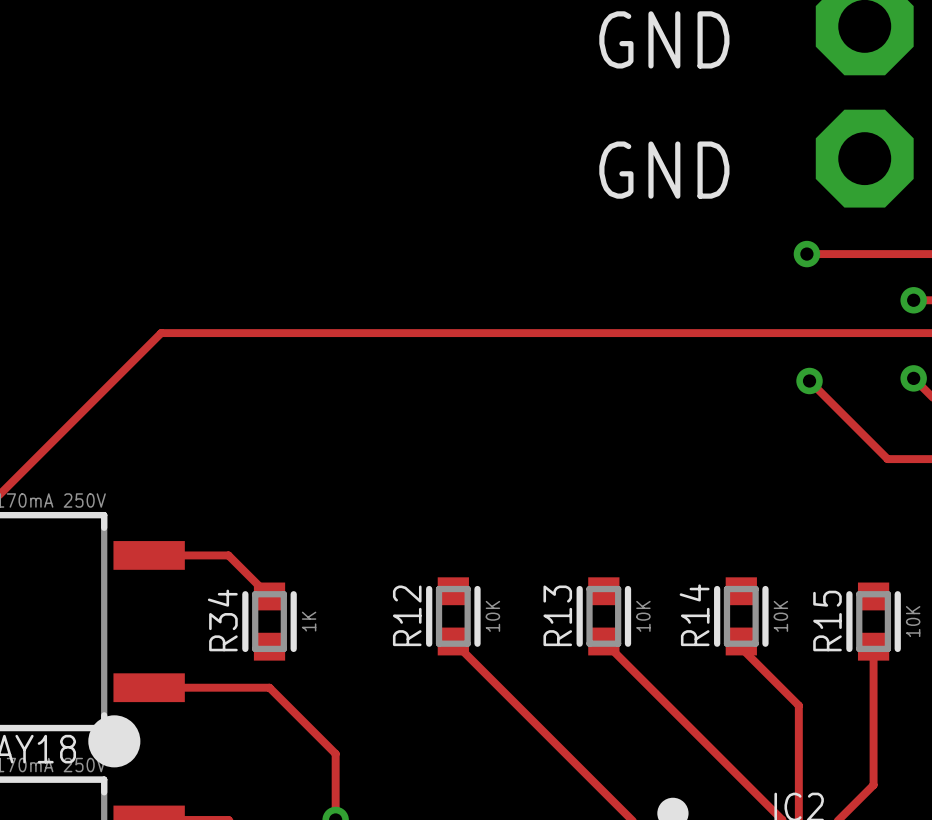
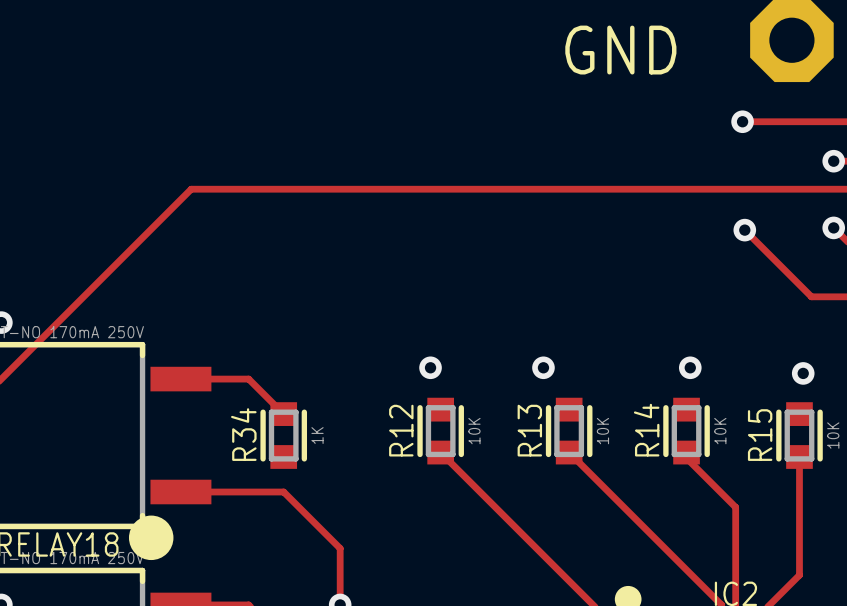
via: none -> (430, 367)
via: none -> (543, 367)
via: none -> (690, 367)
via: none -> (803, 373)

